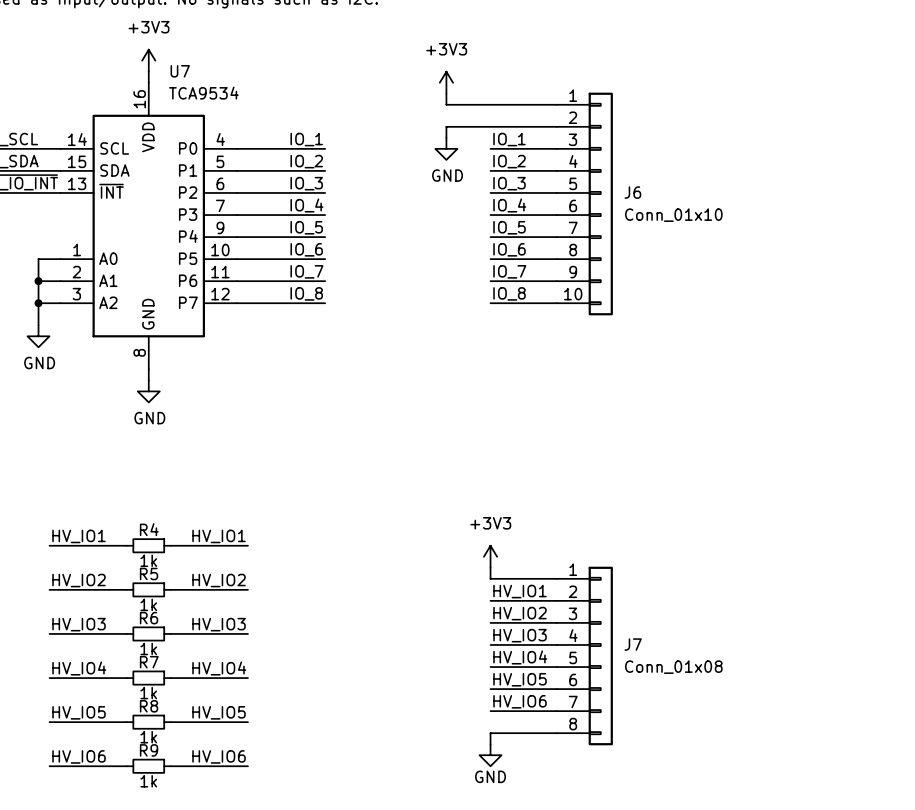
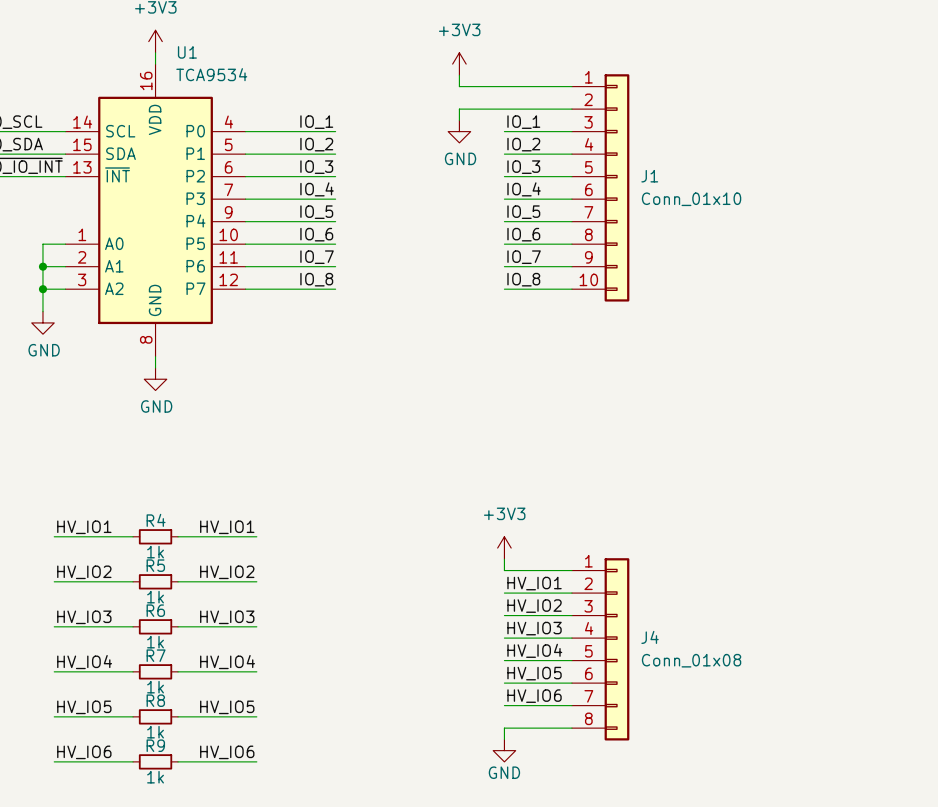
U7 name: U7 (180, 71) -> U1 (187, 52)
J6 name: J6 (632, 192) -> J1 (649, 176)
J7 name: J7 (633, 644) -> J4 (650, 637)

